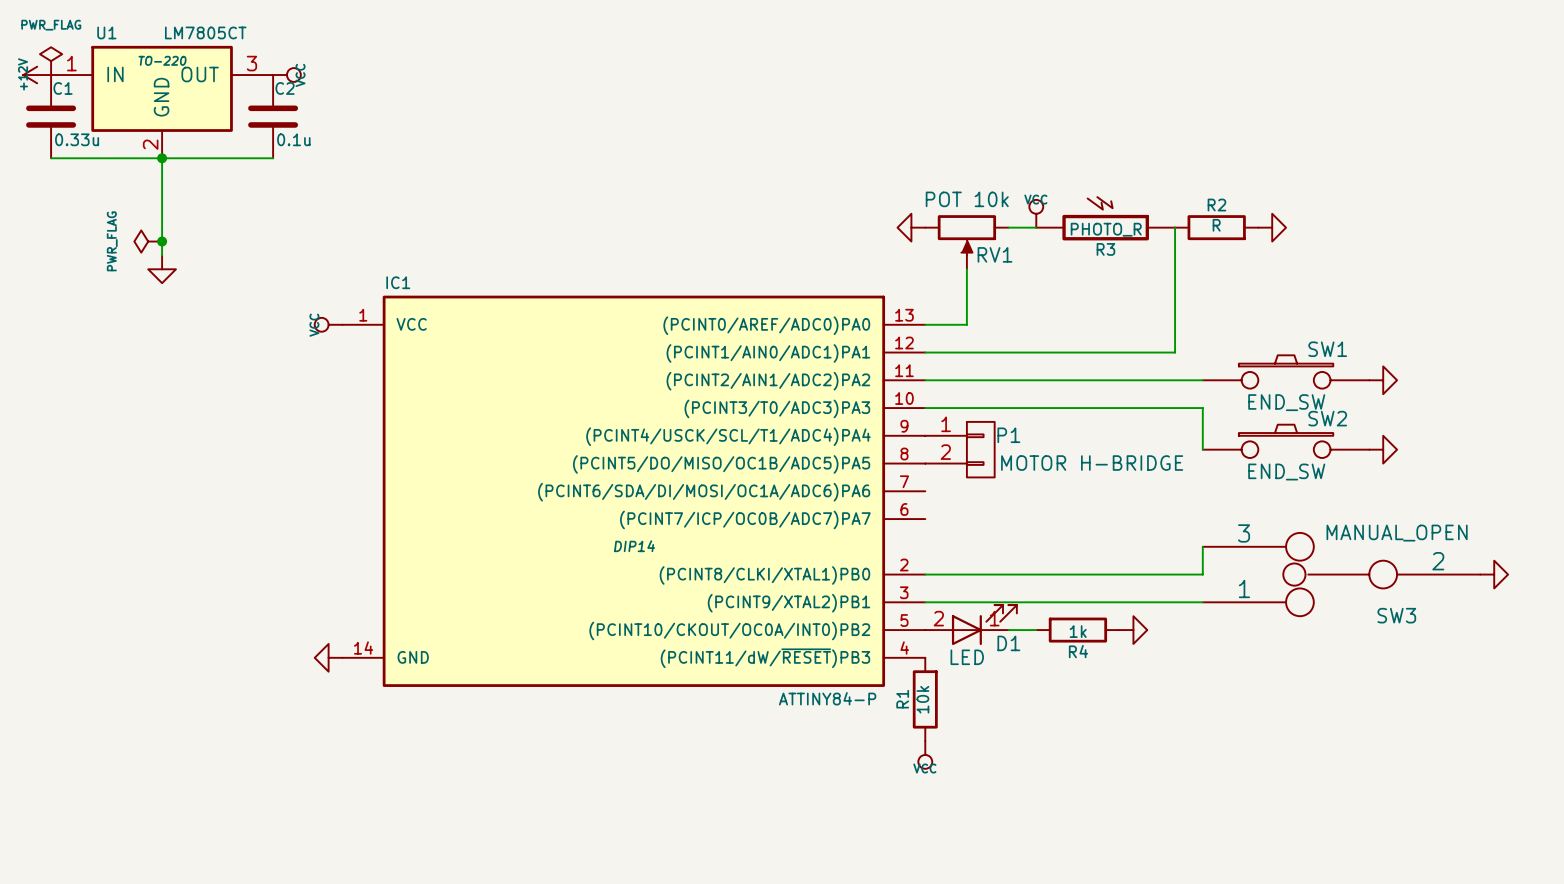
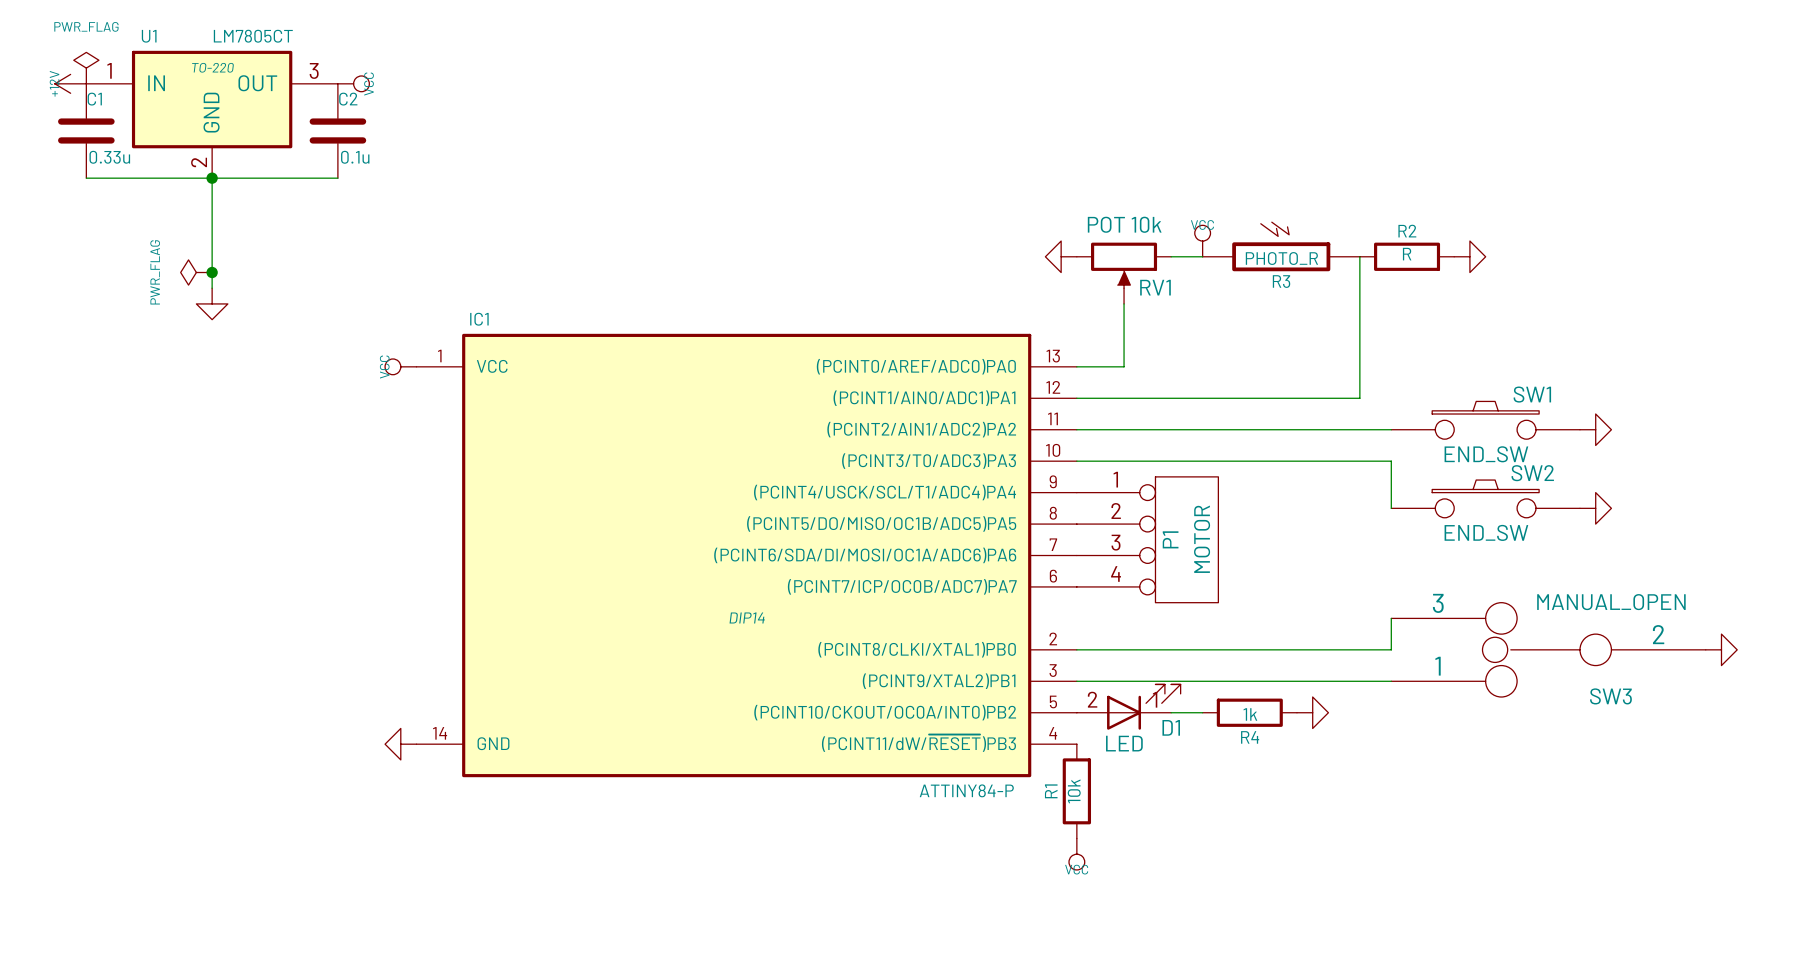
P1 symbol: [925, 421, 995, 478] -> [1076, 476, 1219, 603]
P1 name position: P1 (1008, 435) -> P1 (1170, 539)
P1 value: MOTOR H-BRIDGE (1092, 463) -> MOTOR (1202, 539)

